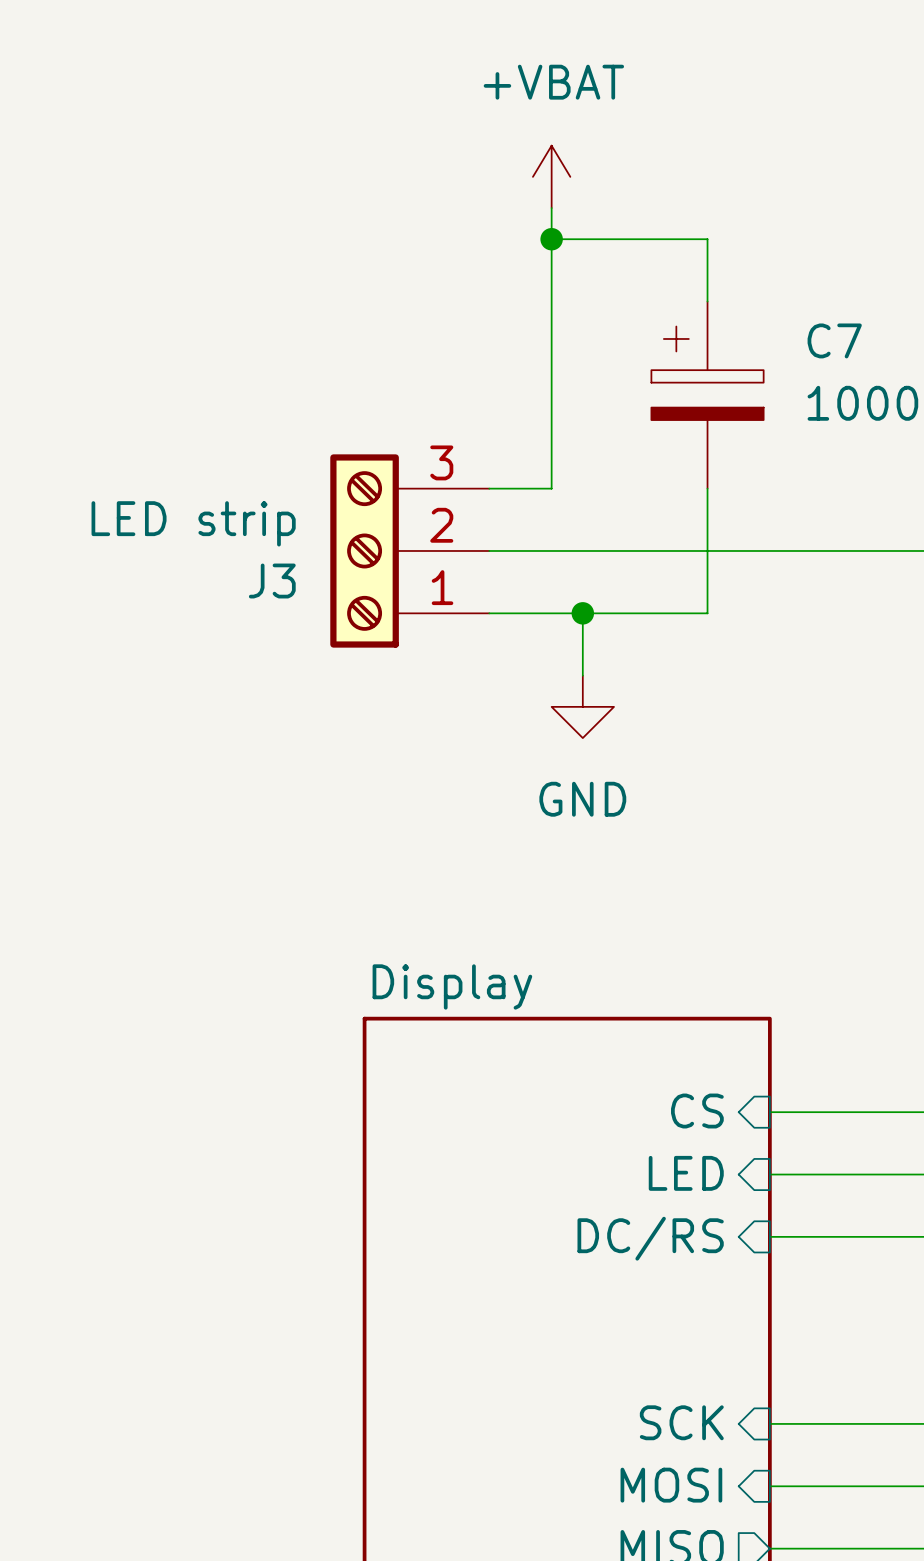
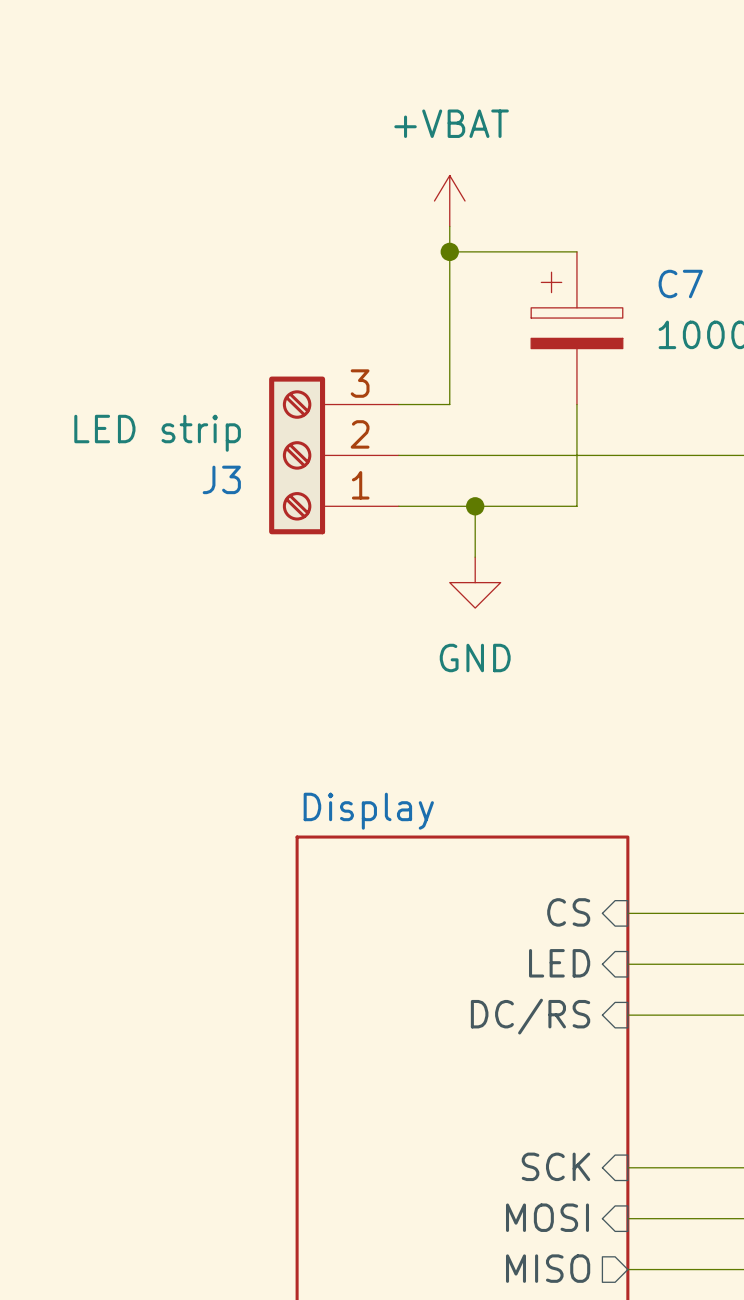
power symbol position: +VBAT (551, 176) -> +VBAT (449, 201)
wire: (551, 239) (707, 239) (707, 301) -> (449, 251) (576, 251)
junction position: (551, 239) -> (449, 251)

